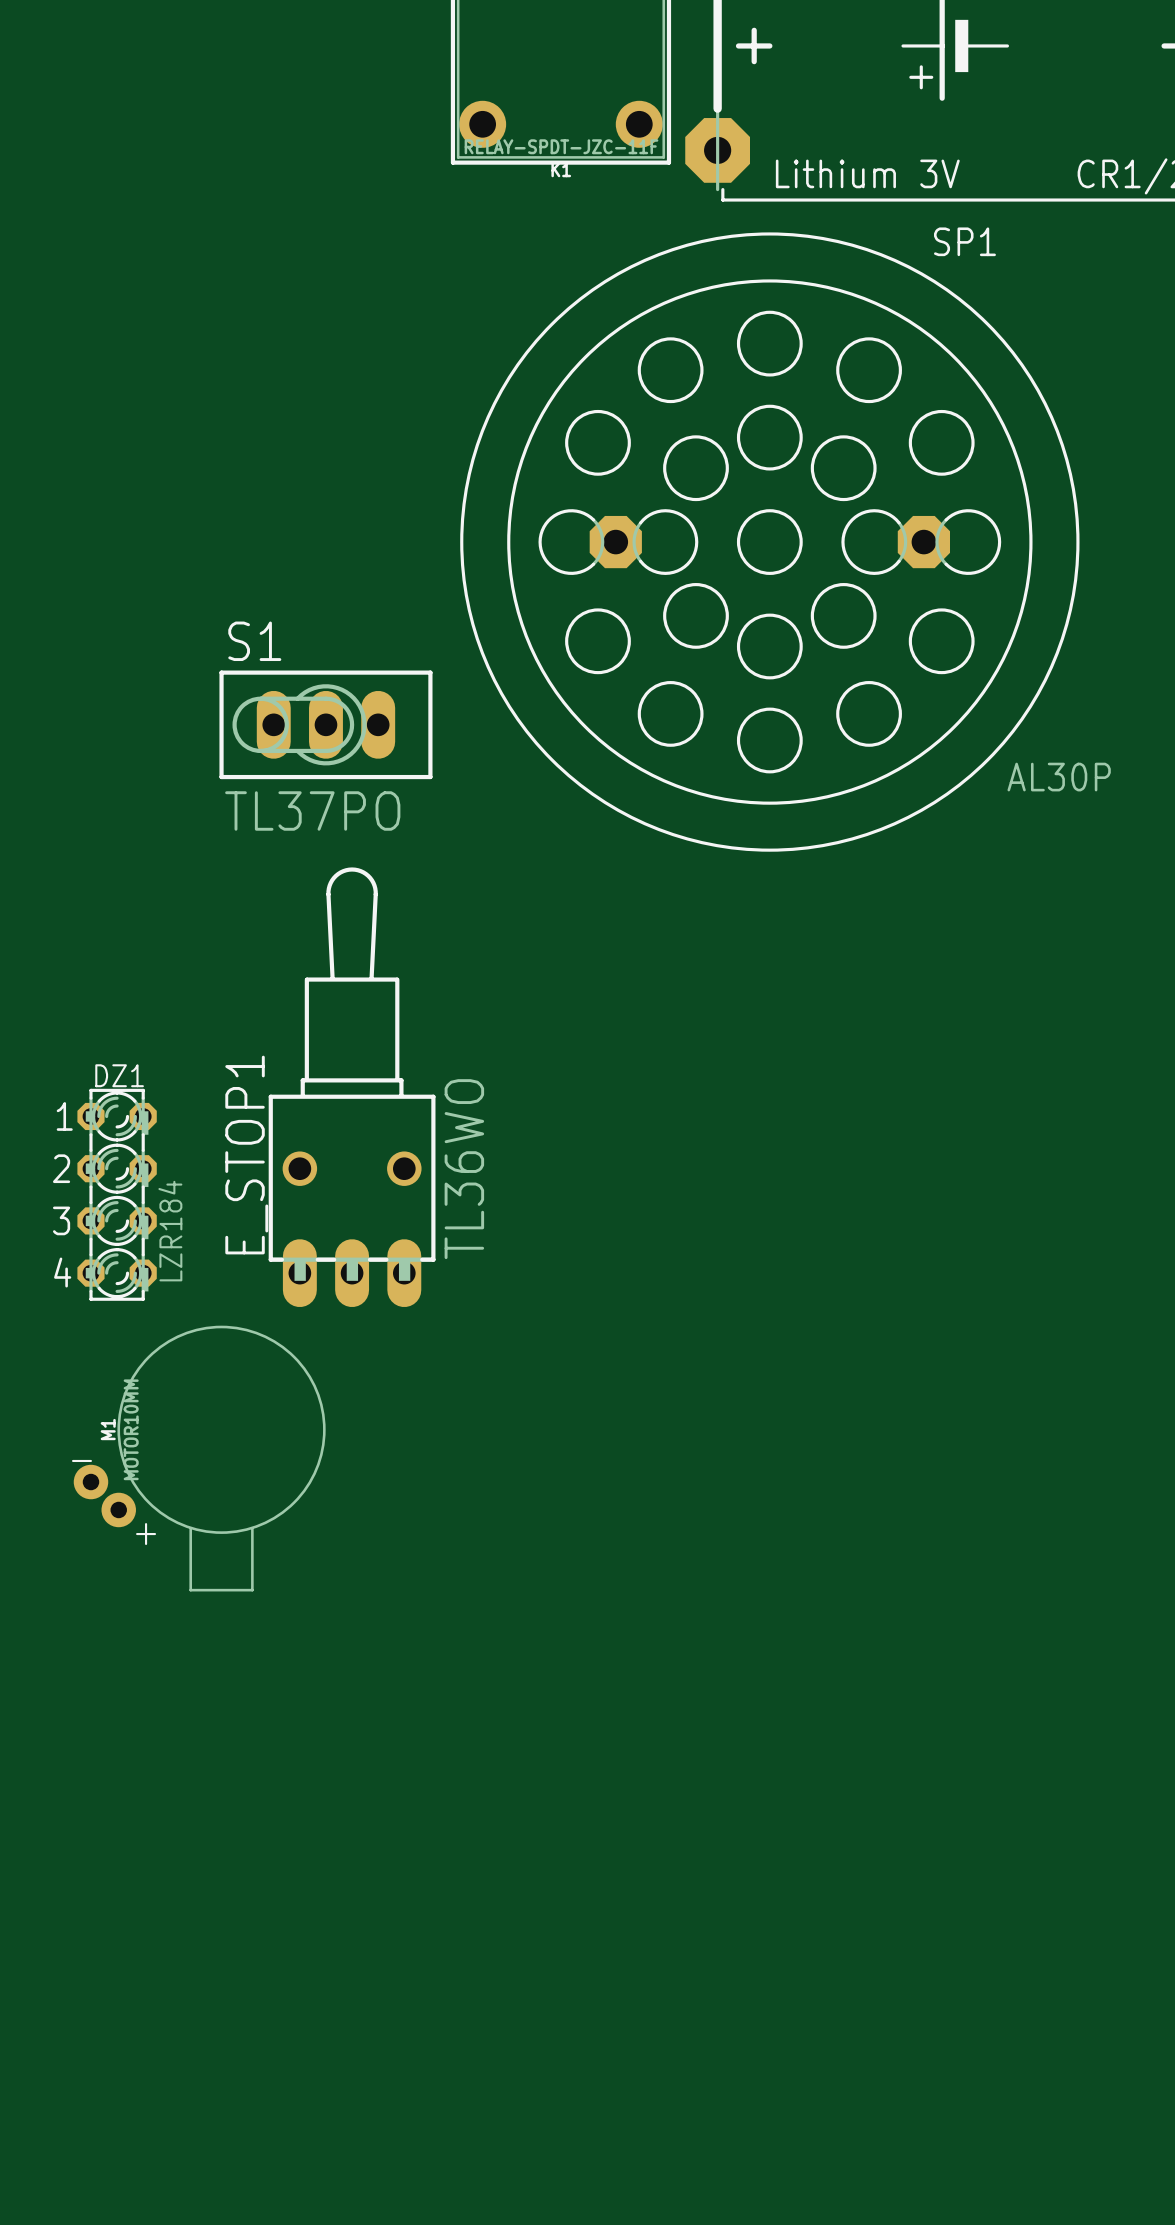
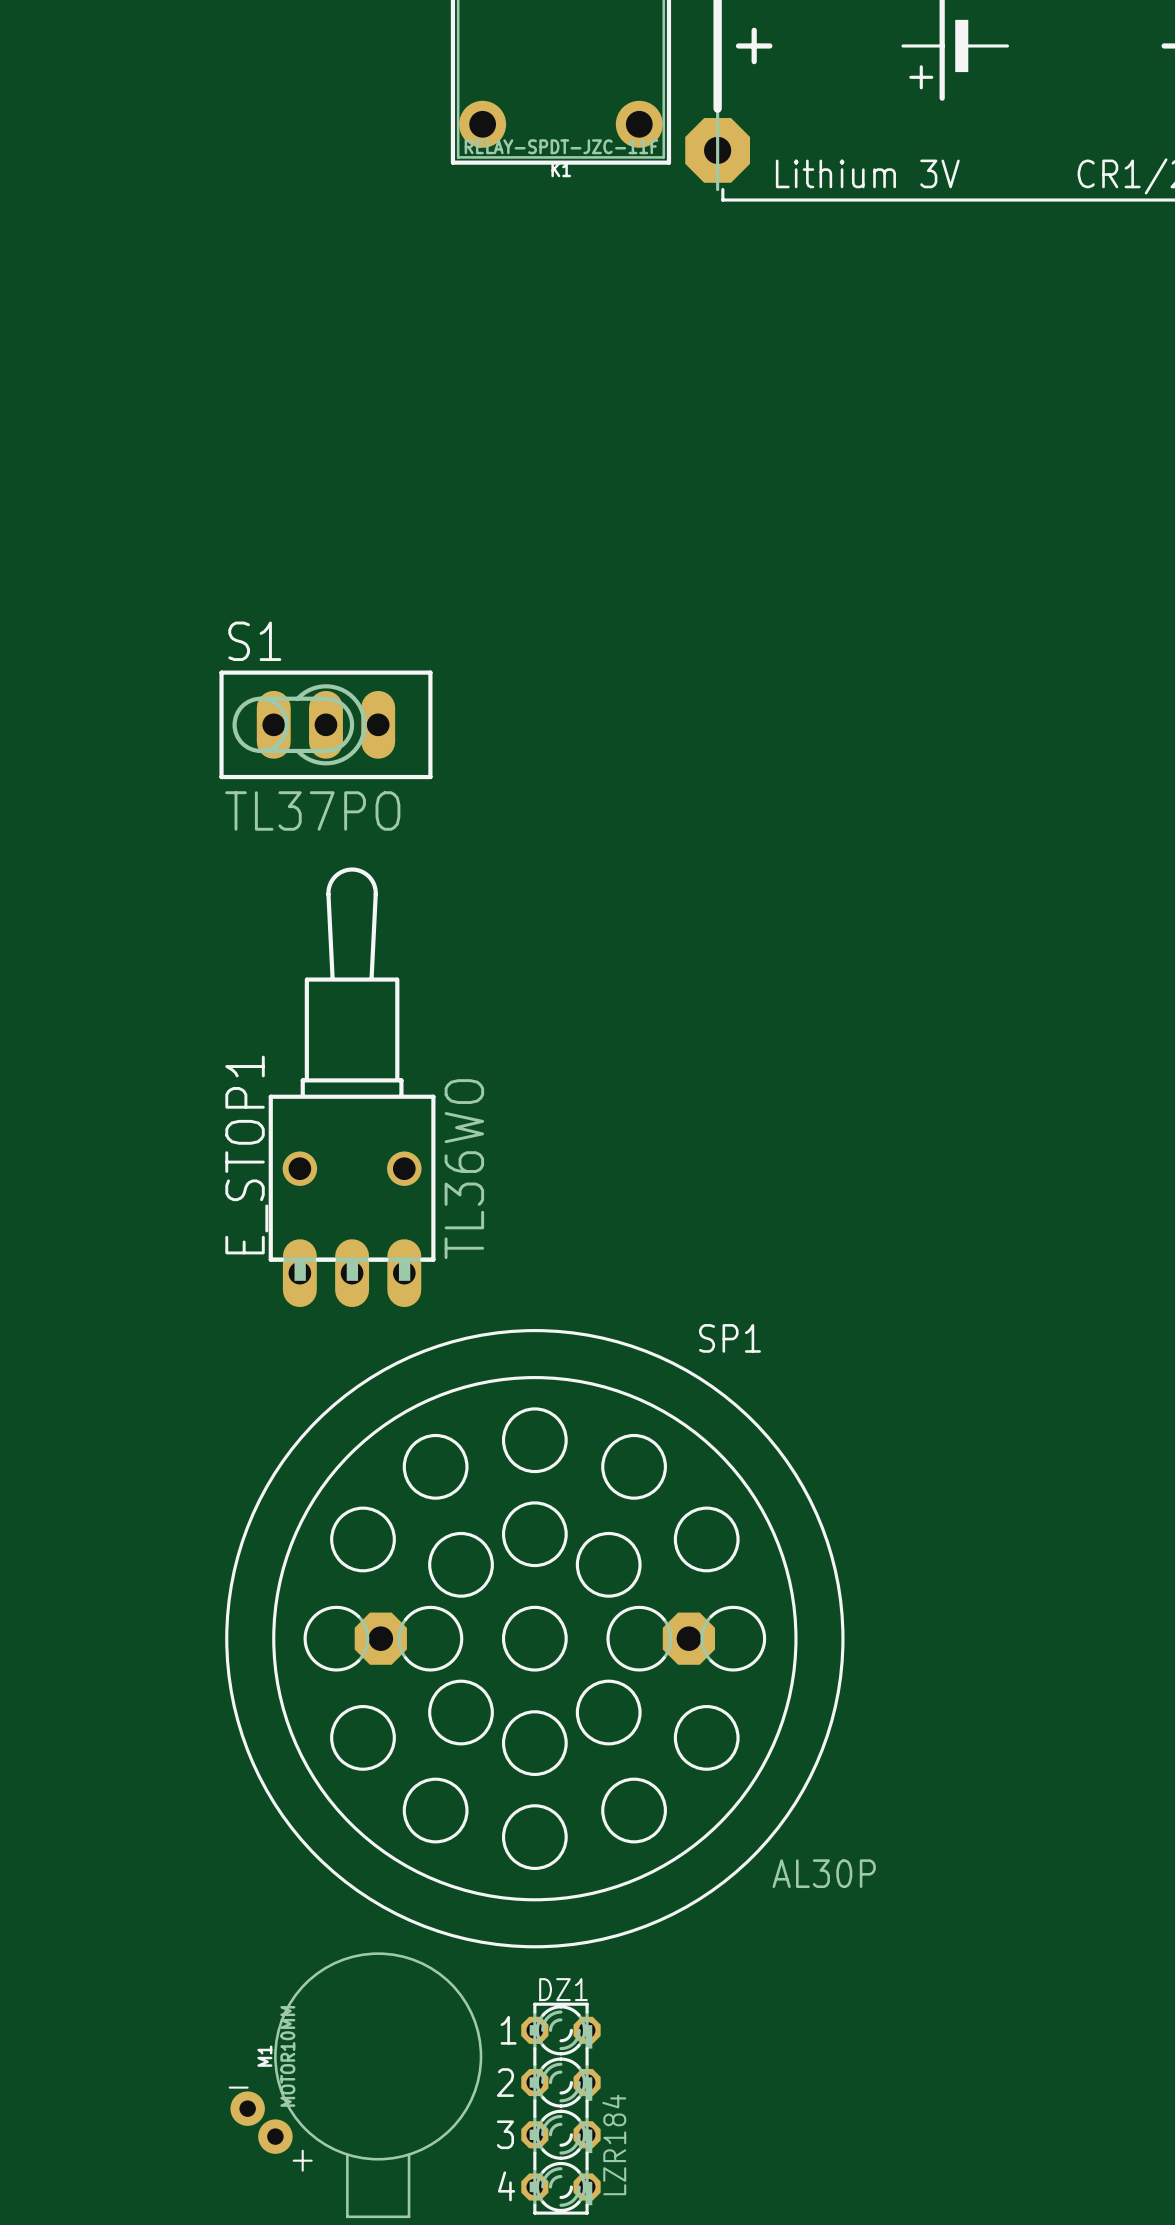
SP1 position: (769, 542) -> (534, 1638)
DZ1 position: (117, 1194) -> (560, 2108)
M1 position: (199, 1458) -> (356, 2085)

